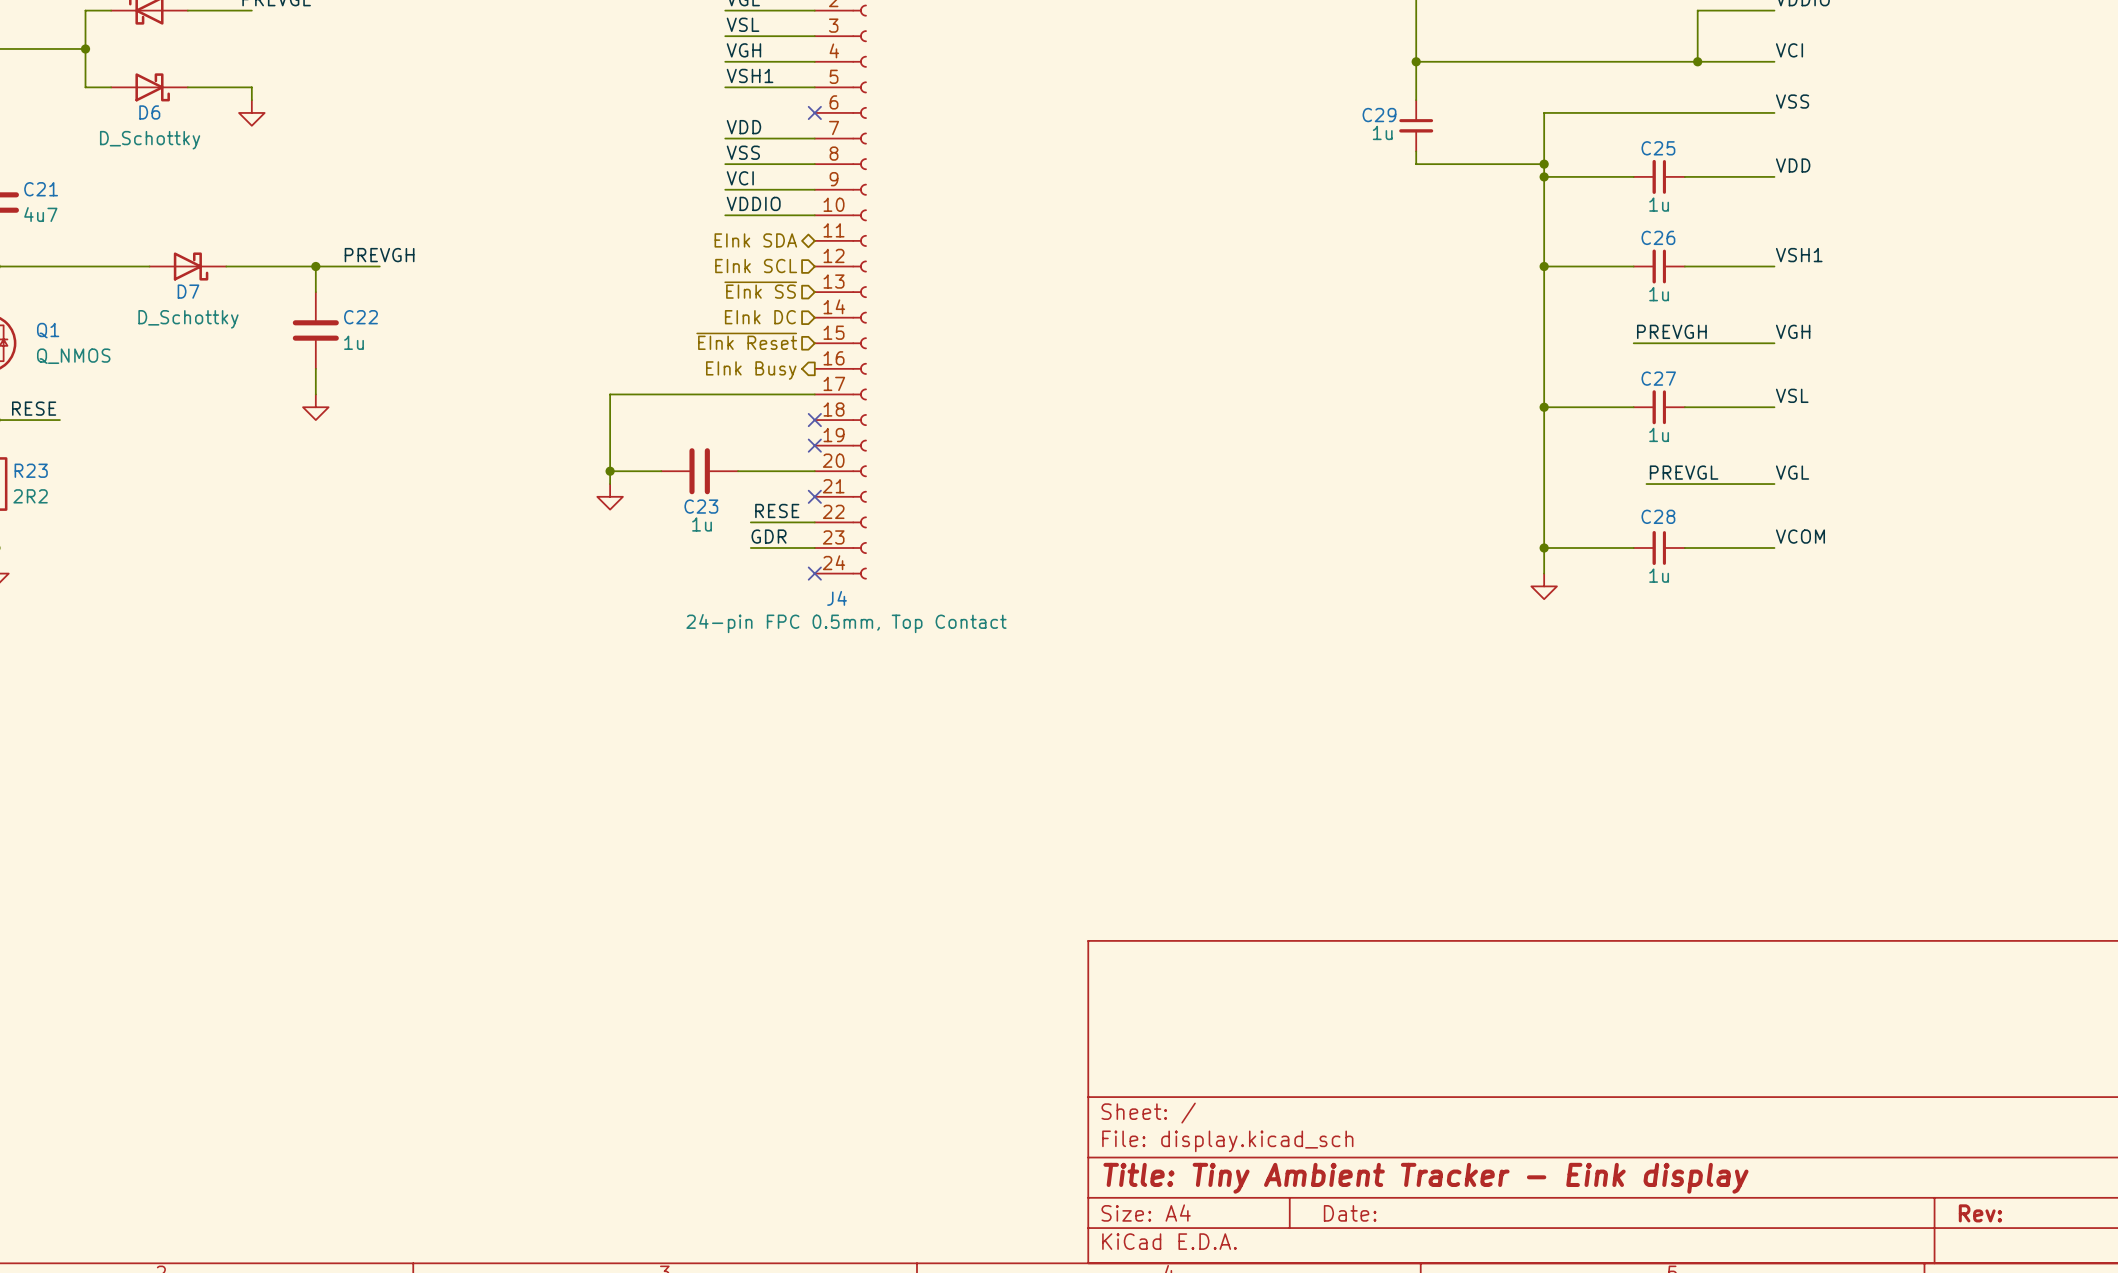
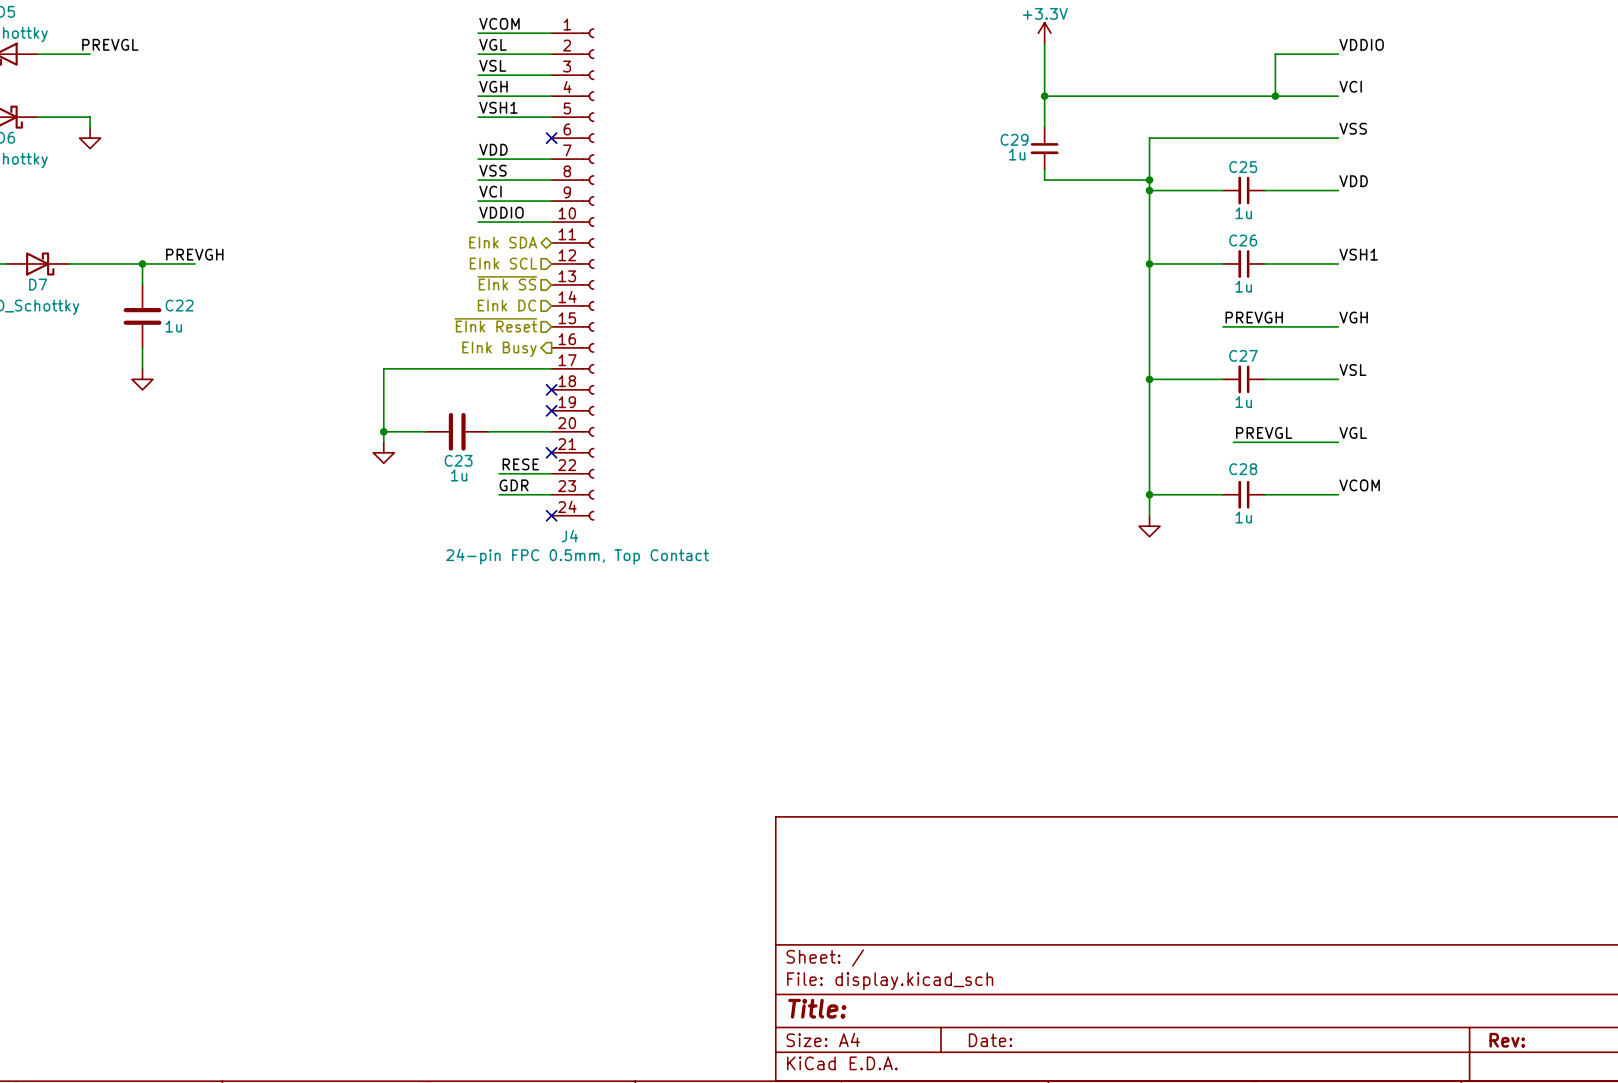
title block: Title: Tiny Ambient Tracker - Eink display (1425, 1178) -> Title: (817, 1008)

